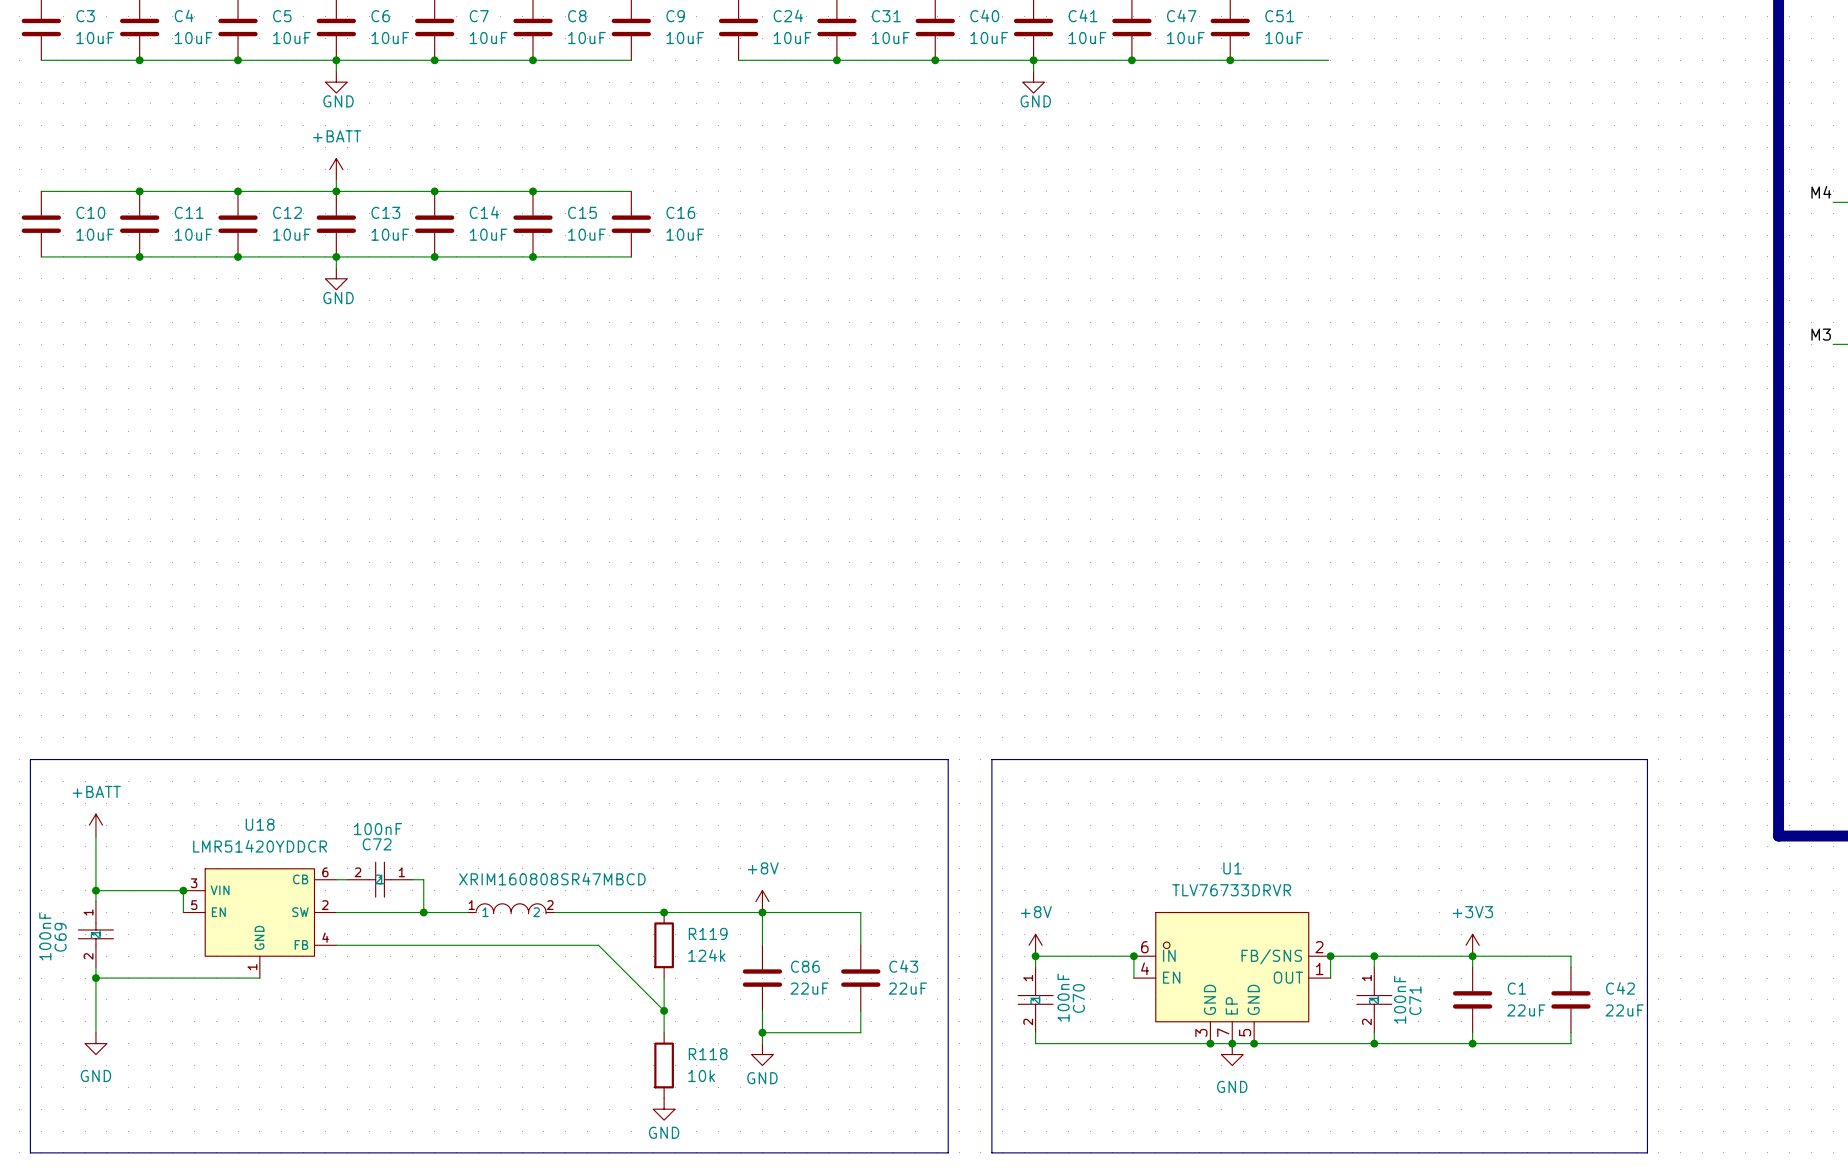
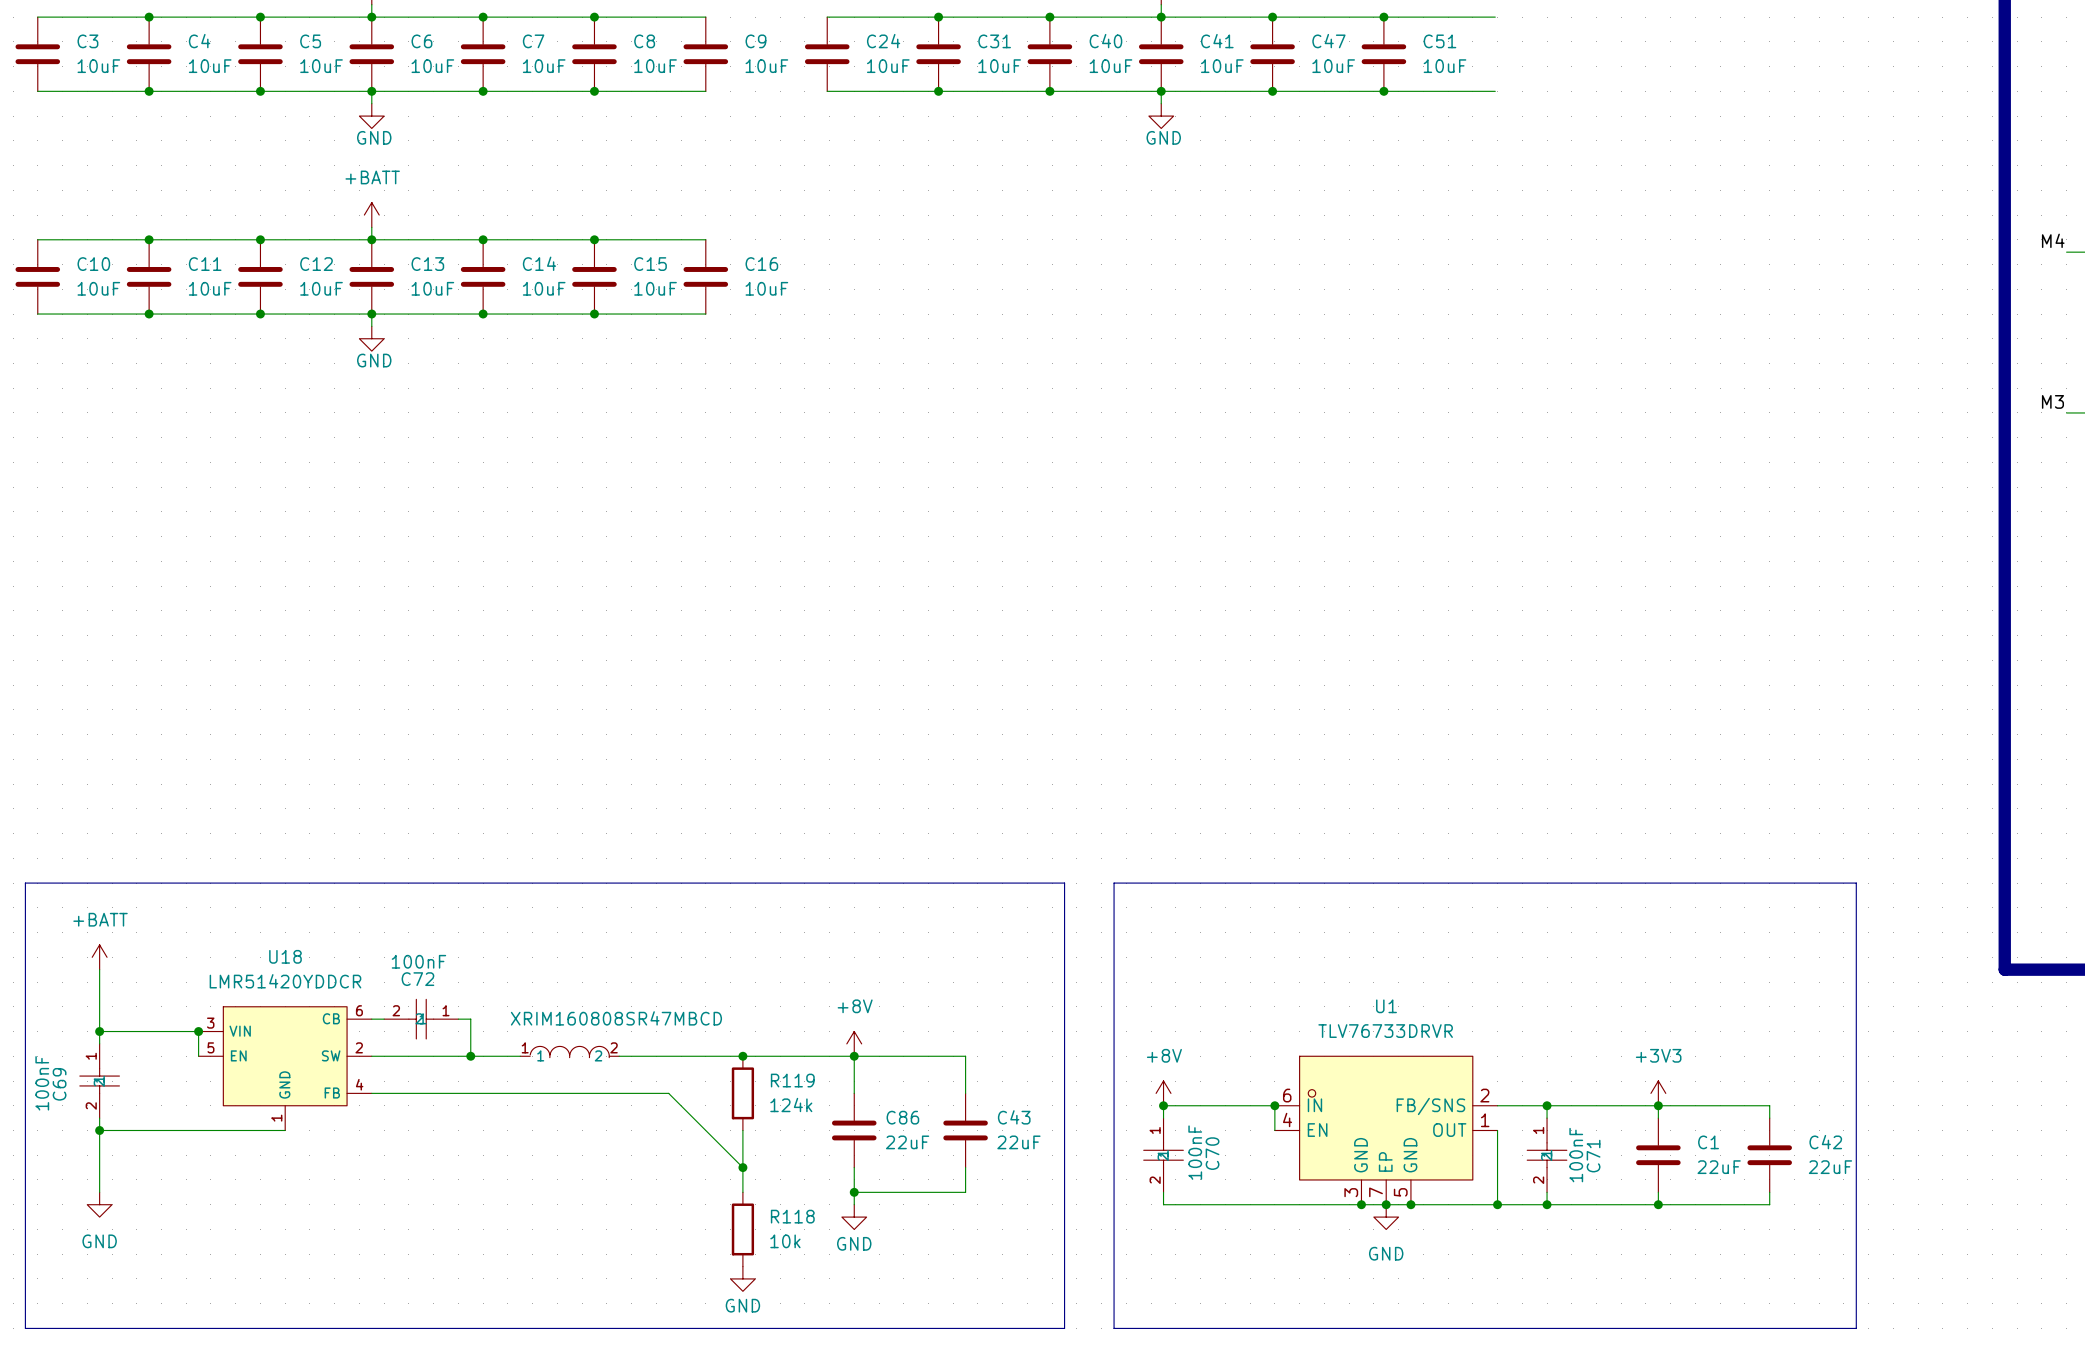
wire: (1330, 956) (1330, 978) -> (1497, 1204) (1497, 1130)
junction: (1330, 956) -> none
junction: none -> (1497, 1204)

